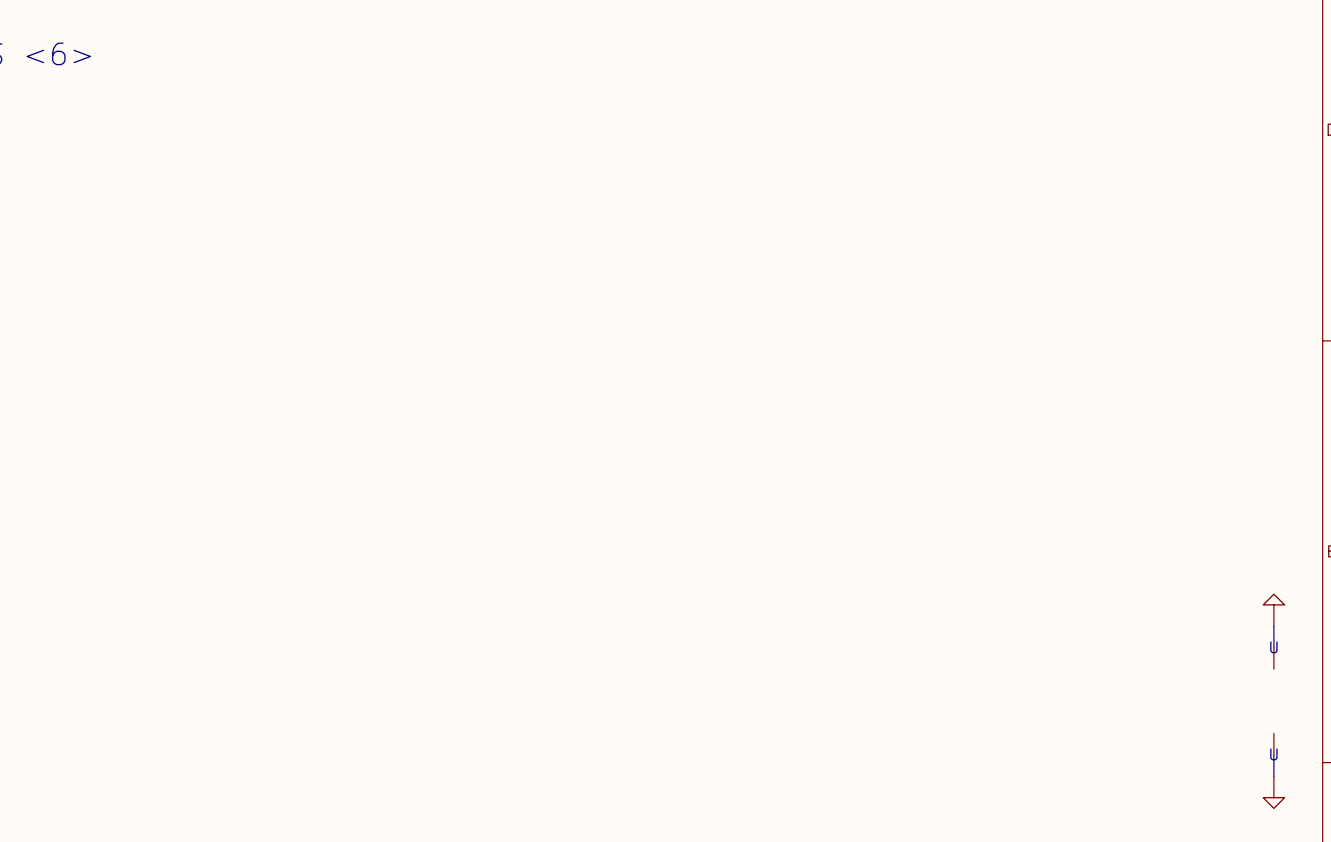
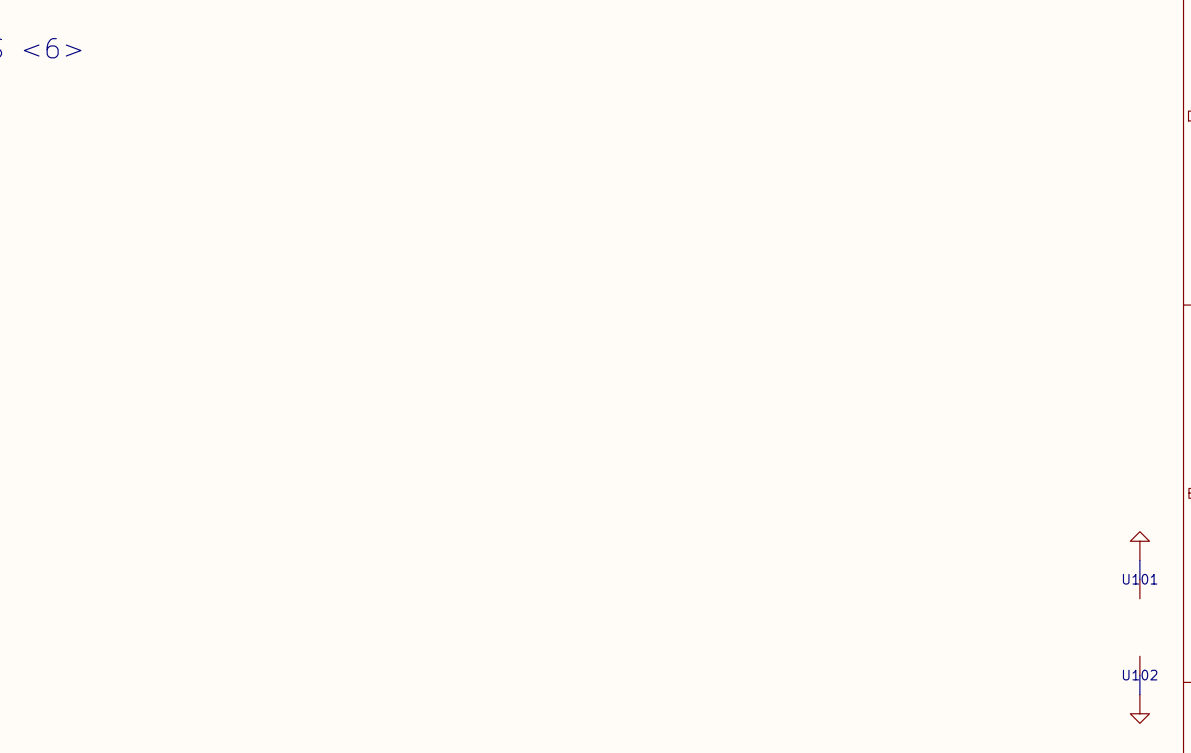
U name: U (1273, 647) -> U101 (1140, 579)
U name: U (1273, 754) -> U102 (1140, 675)

